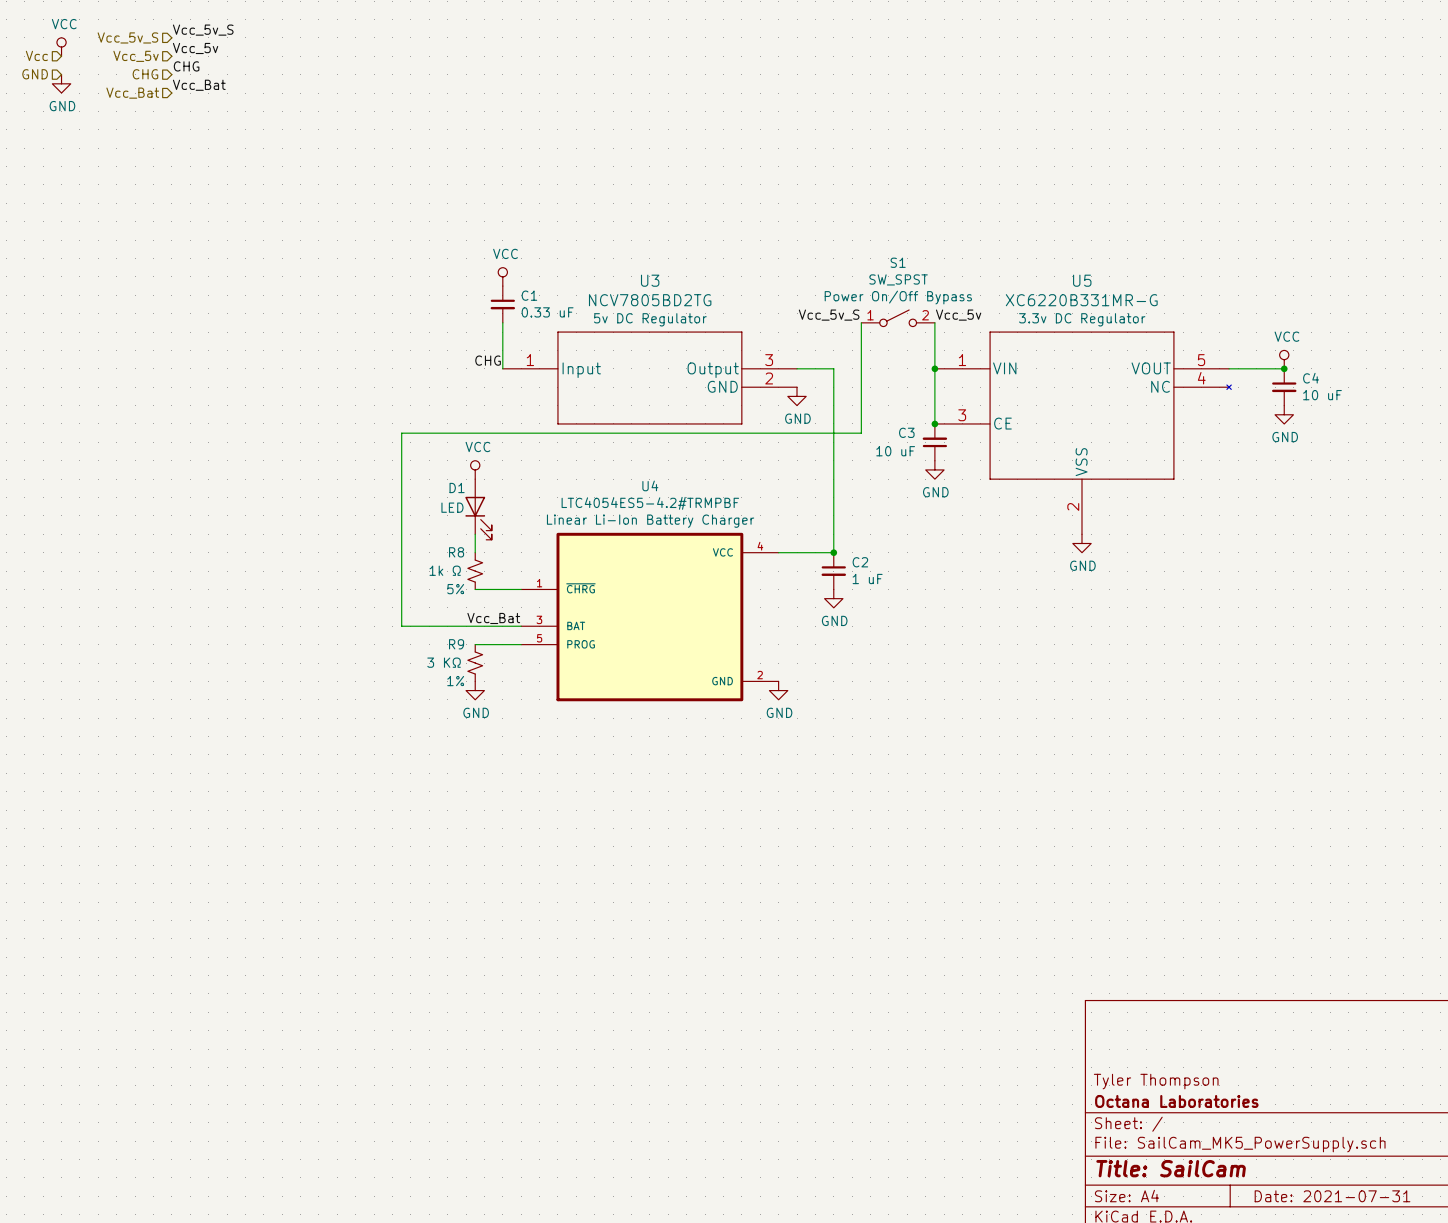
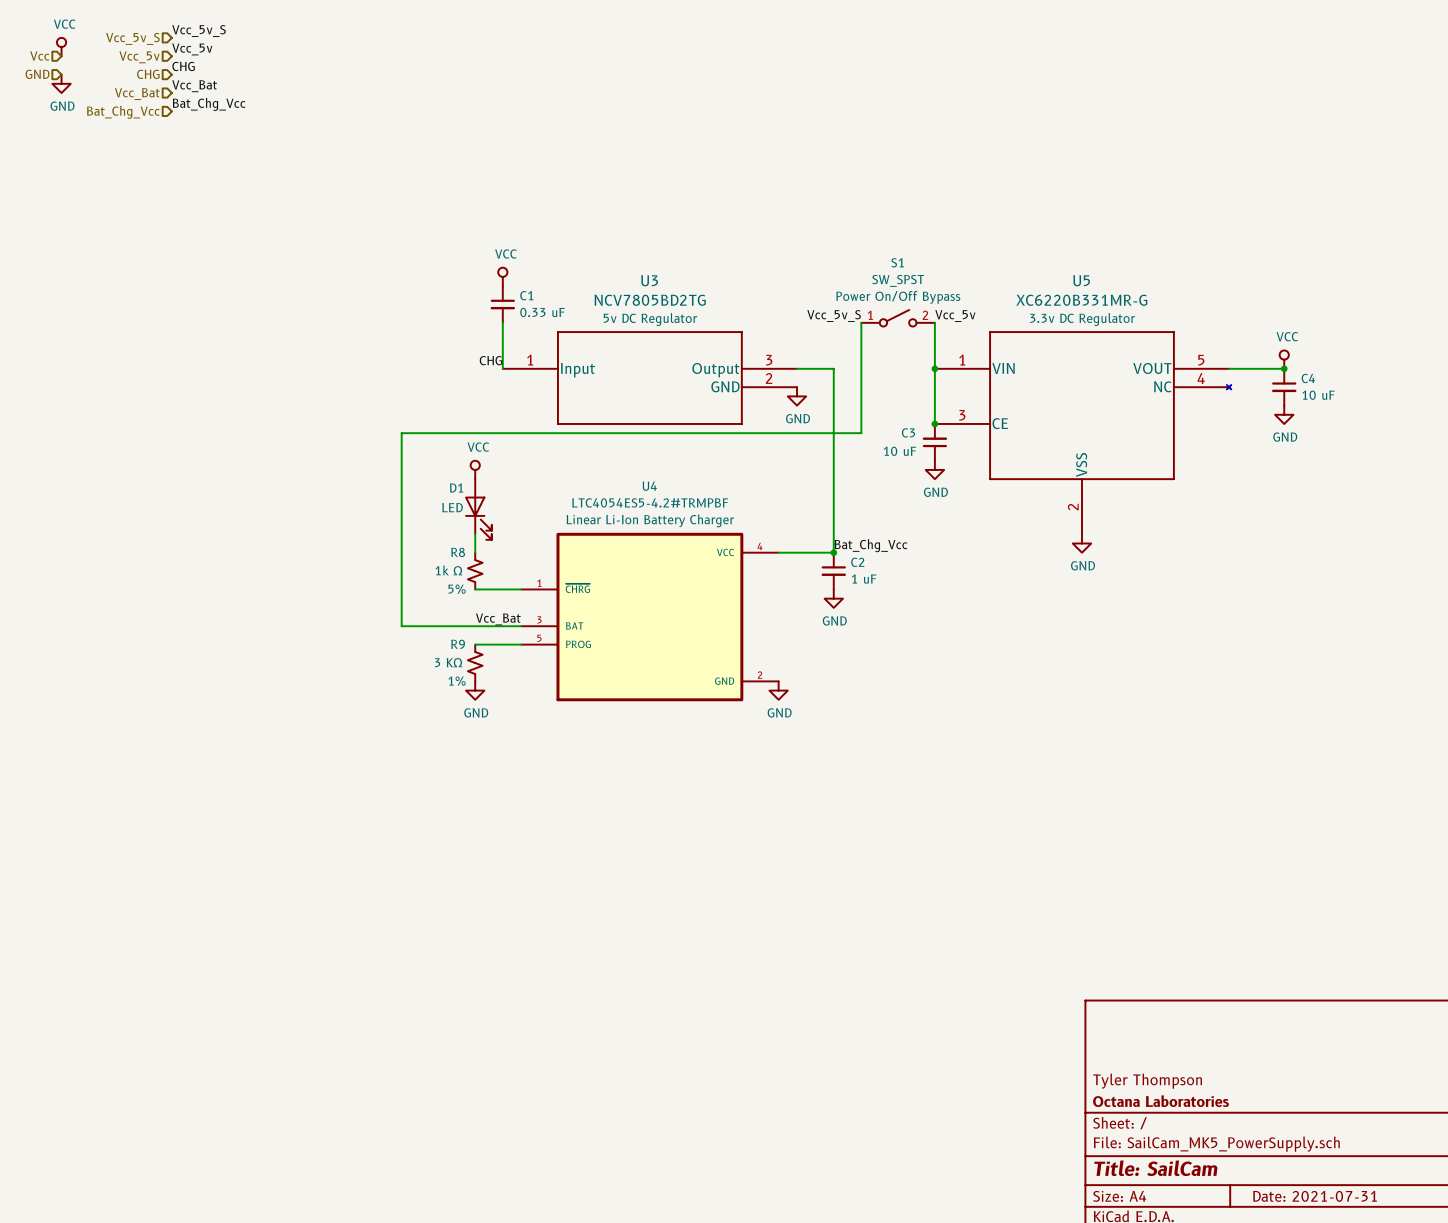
label: none -> Bat_Chg_Vcc (209, 104)
hierarchical label: none -> Bat_Chg_Vcc (123, 112)
label: none -> Bat_Chg_Vcc (871, 545)

